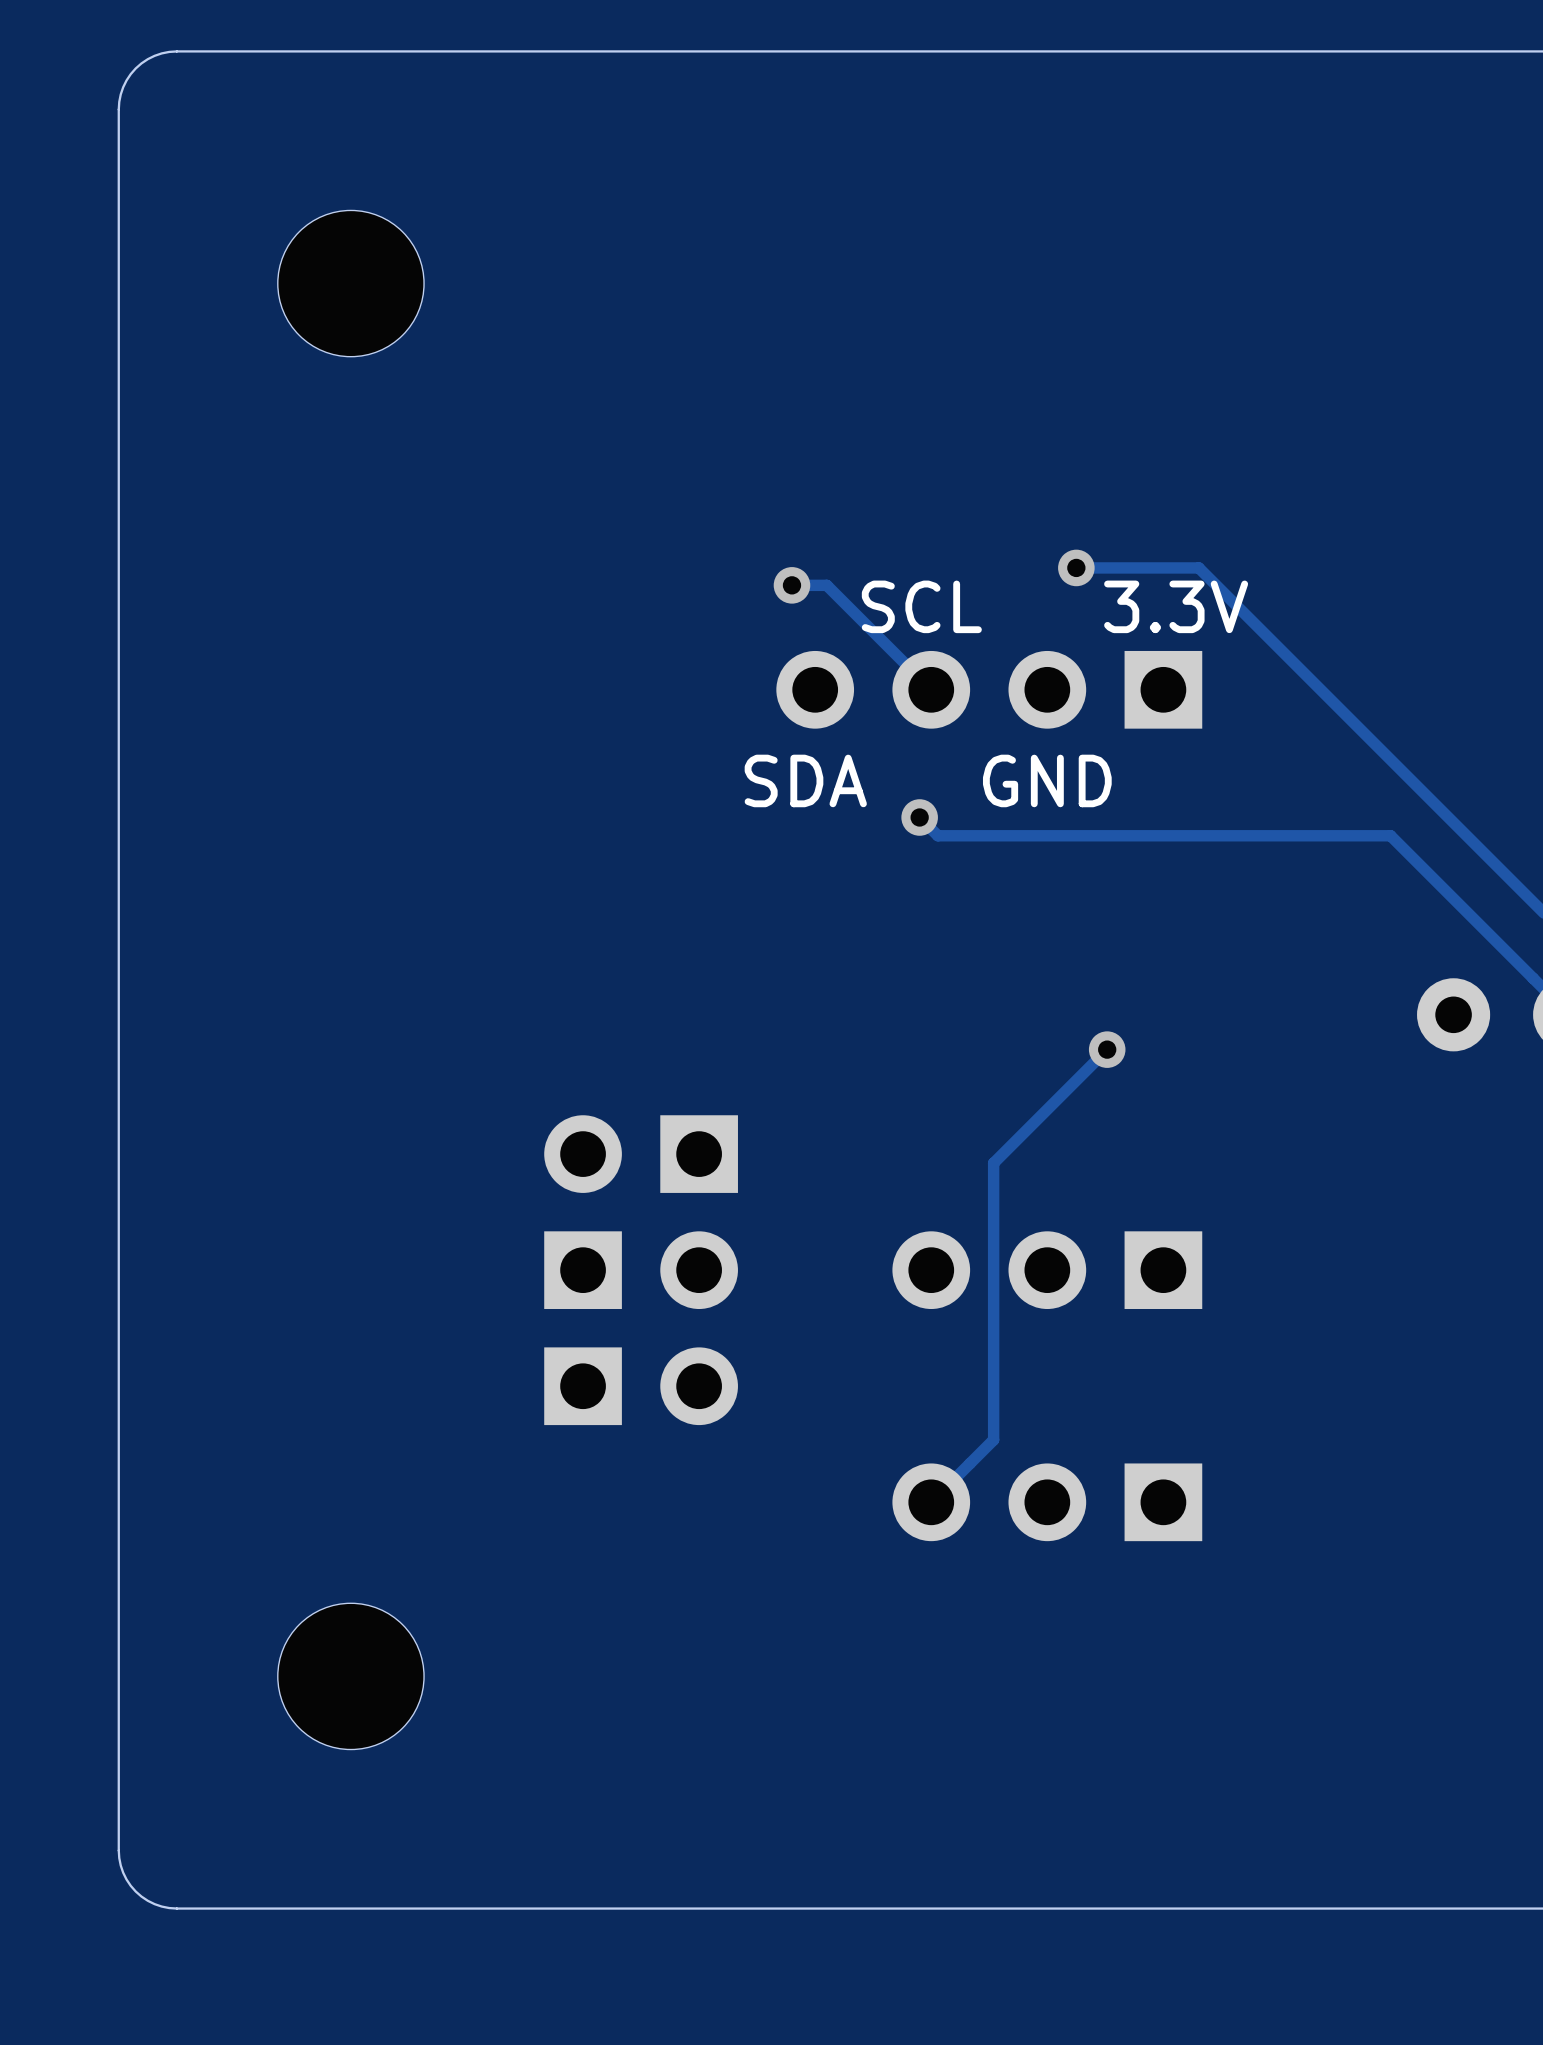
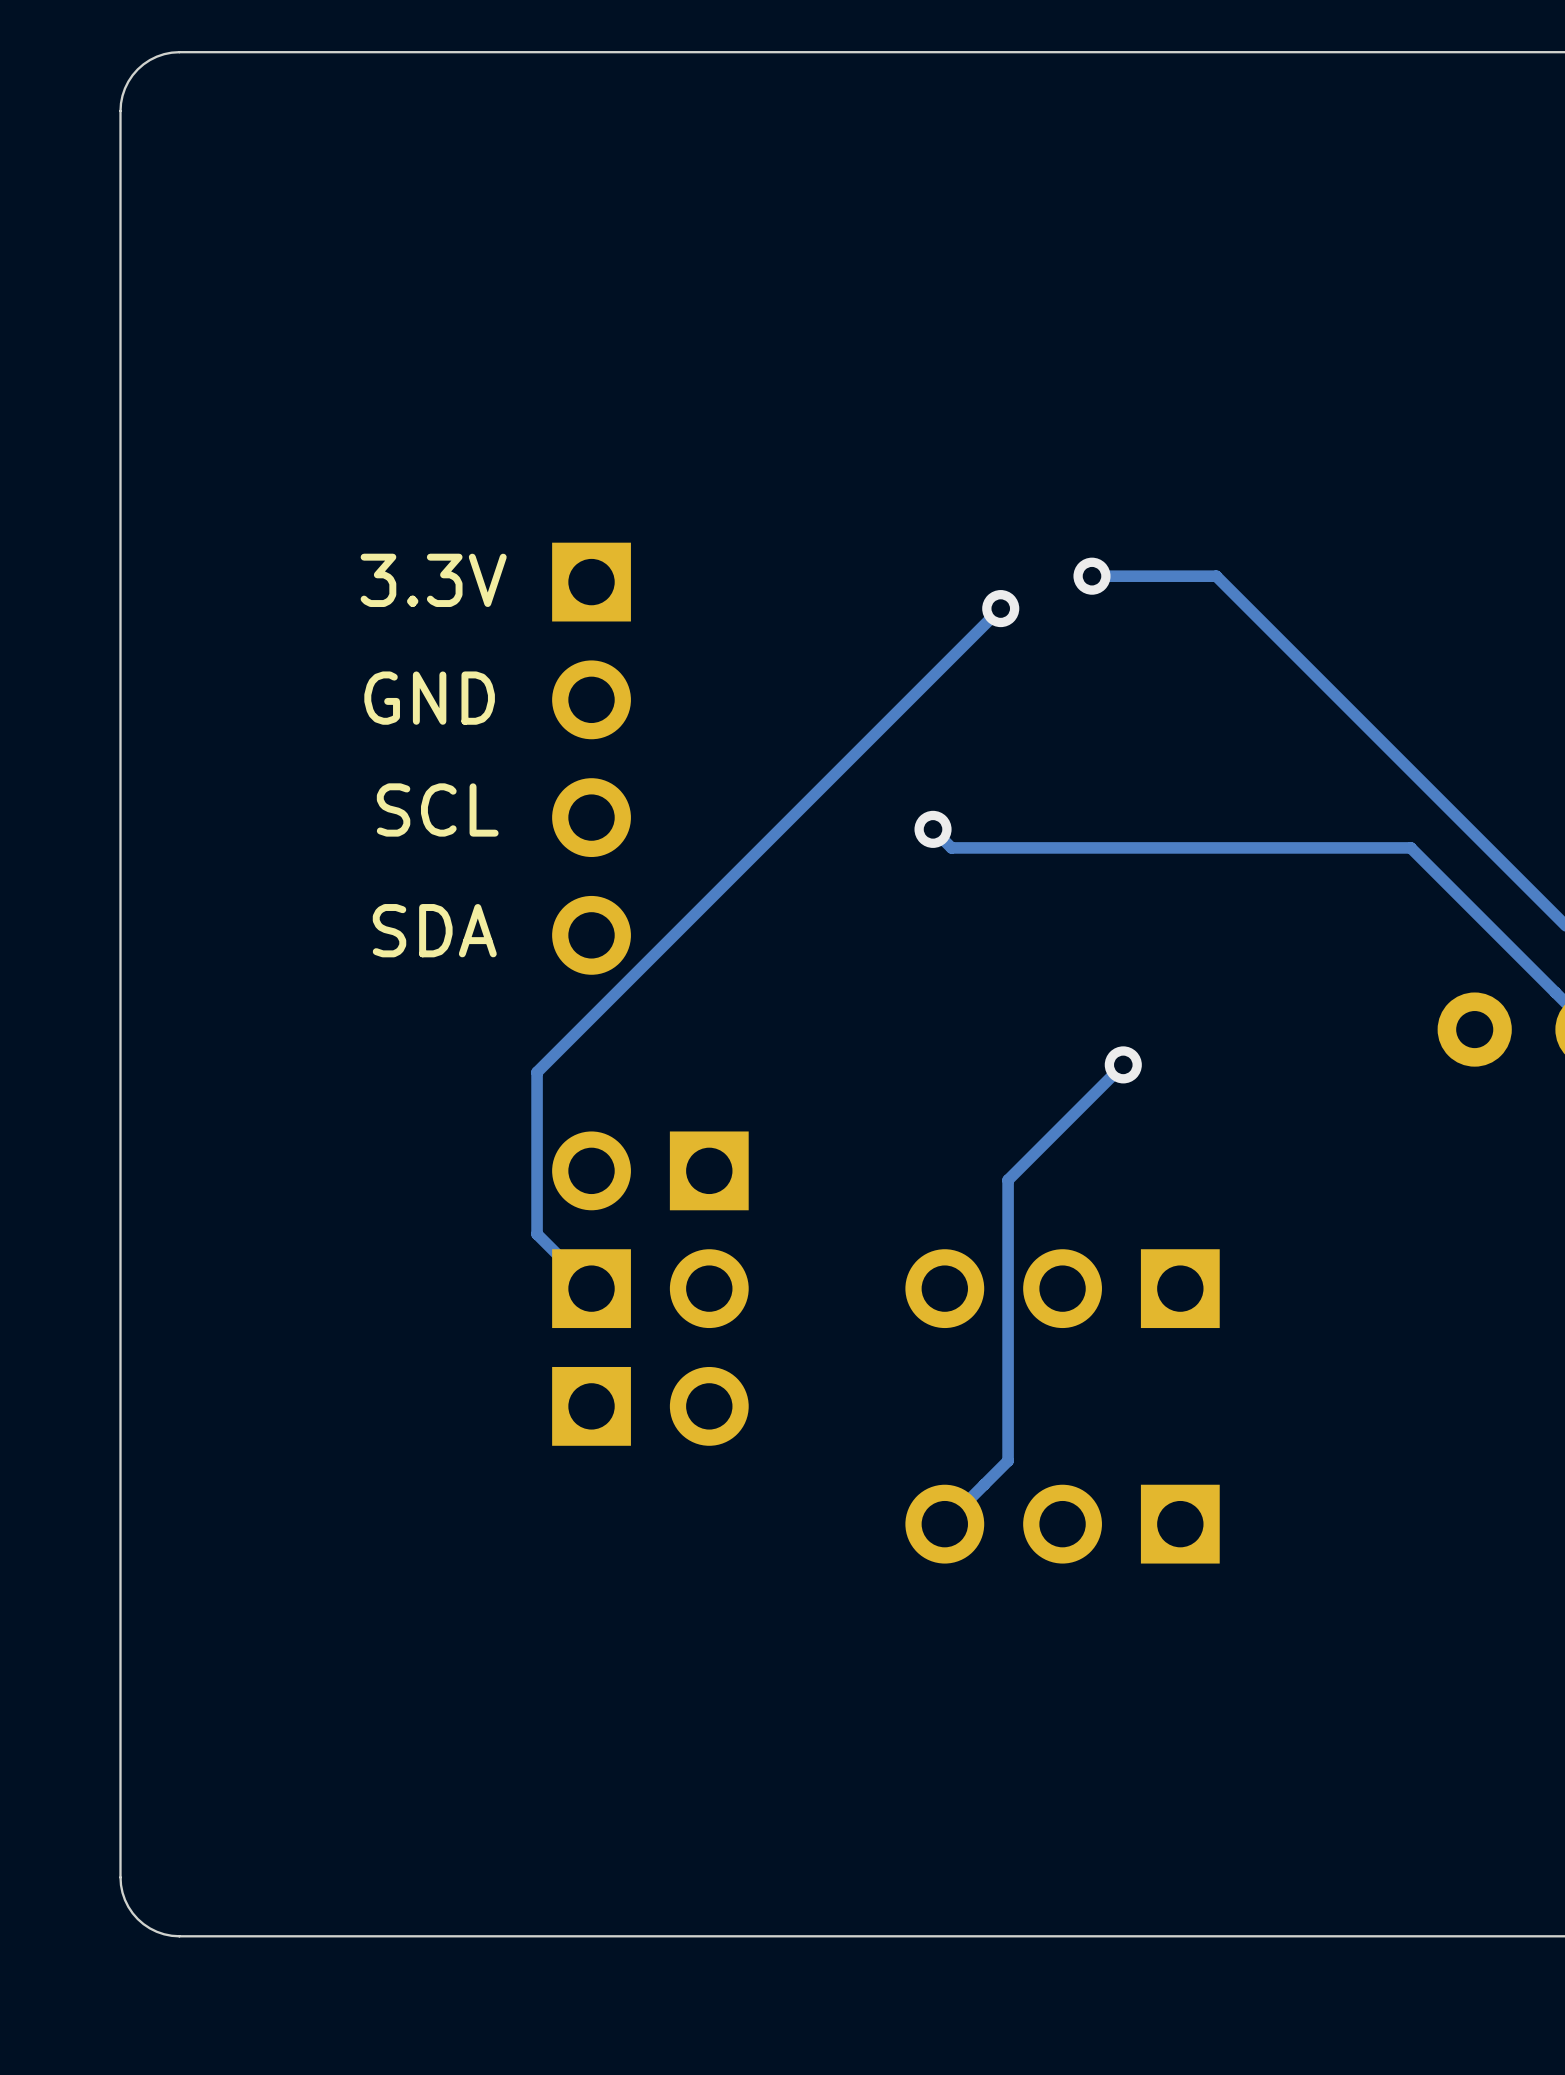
part: (350, 283) -> none
track: (791, 585) (826, 585) (931, 689) -> none
via position: (791, 585) -> (1000, 608)
track: none -> (1000, 608) (537, 1072) (537, 1234) (591, 1288)
text position: SCL (921, 606) -> SCL (437, 809)
text position: 3.3V (1176, 606) -> 3.3V (433, 580)
part rotation: 0° (989, 689) -> 90° counterclockwise (591, 758)
part position: (989, 689) -> (591, 758)
text position: SDA (805, 780) -> SDA (434, 930)
text position: GND (1047, 780) -> GND (429, 698)
part: (350, 1676) -> none

